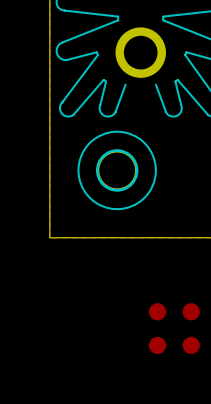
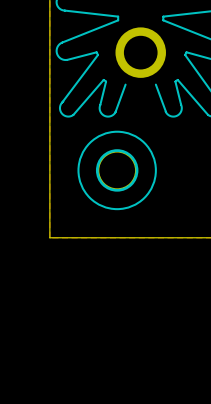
part: (157, 311) -> none
part: (191, 311) -> none
part: (157, 345) -> none
part: (191, 345) -> none

